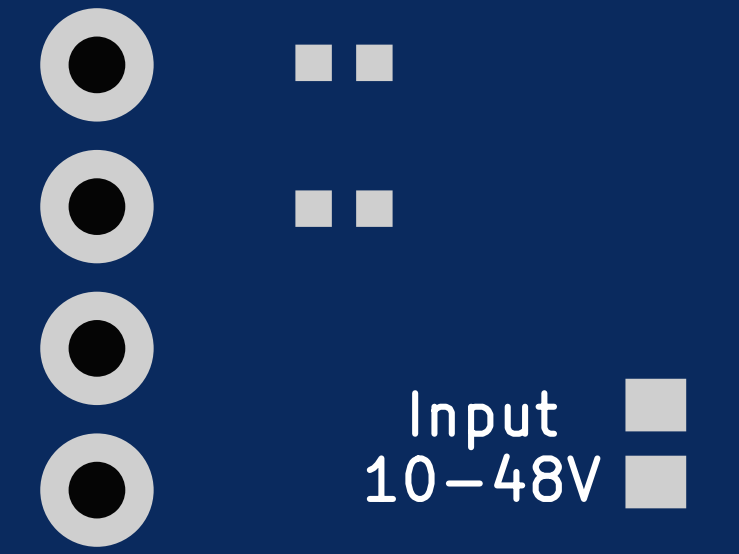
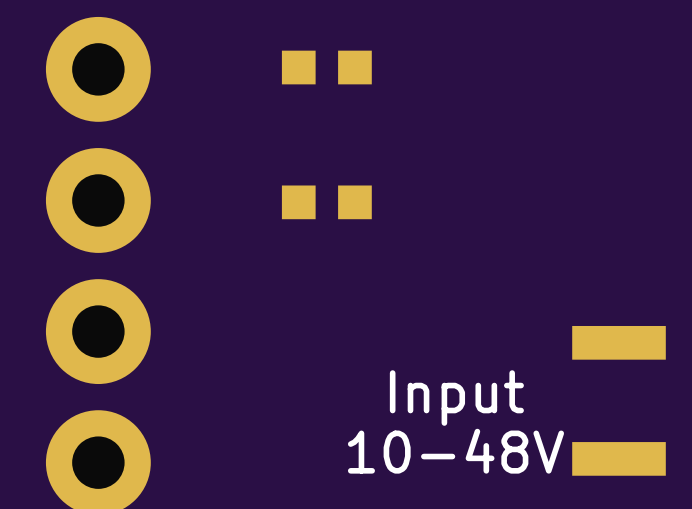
part footprint: [625, 378, 687, 509] -> [572, 325, 666, 476]

